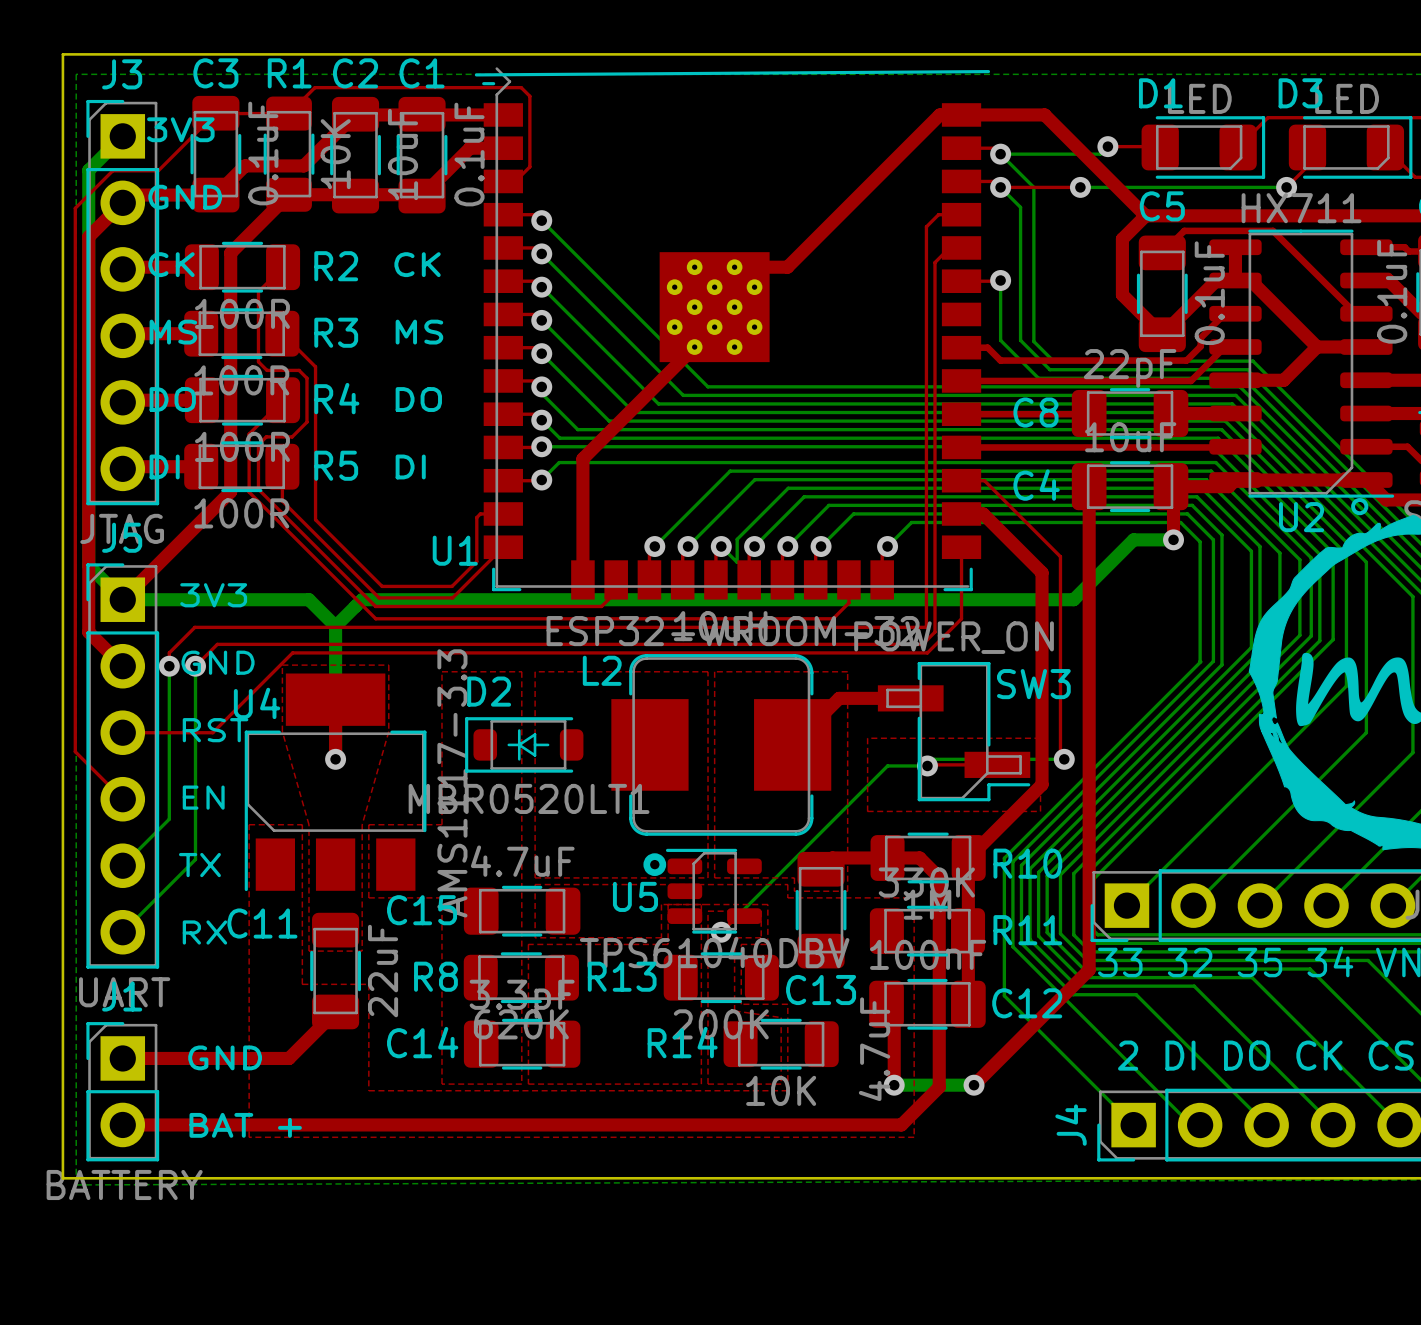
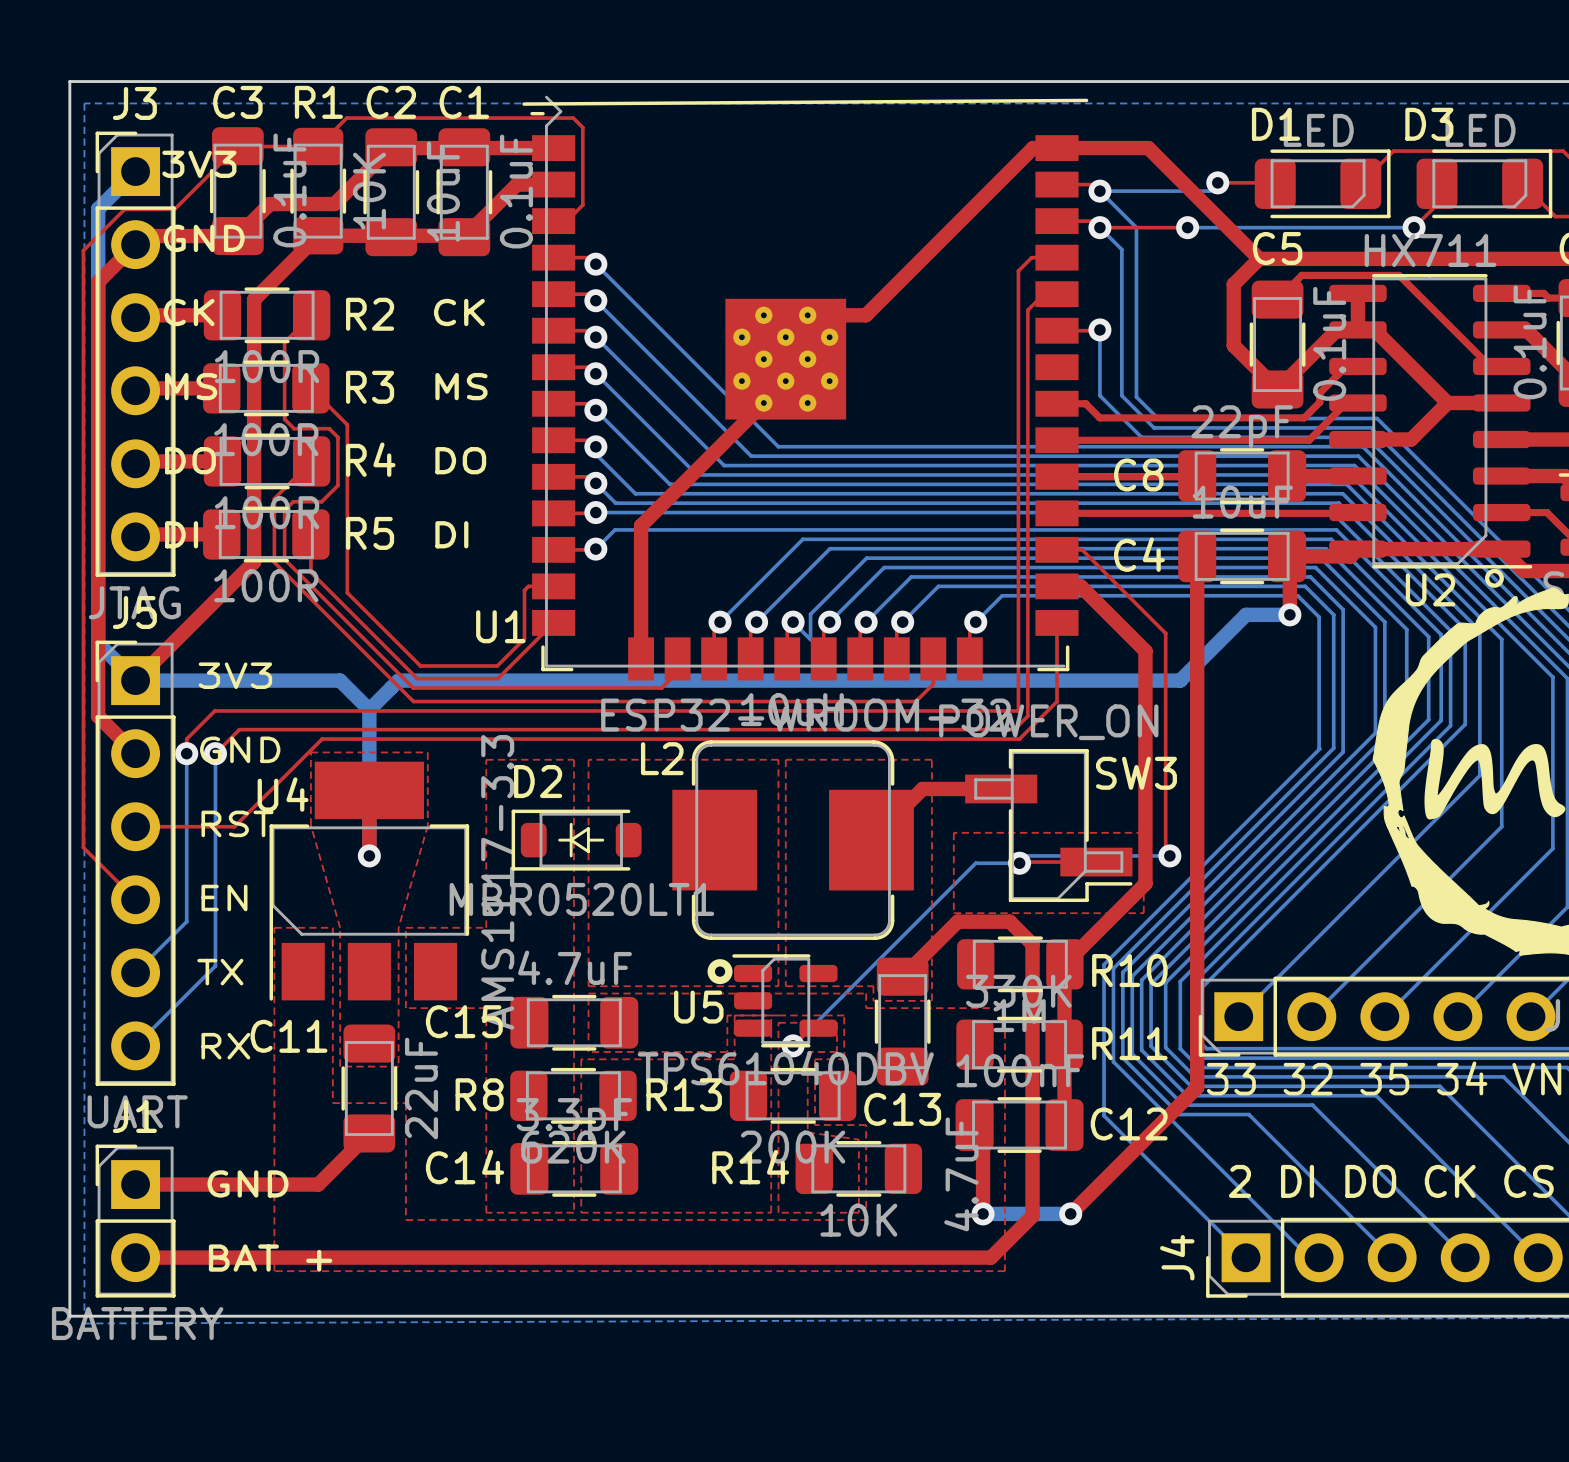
top track: (832, 857) (919, 857) (939, 877) -> (915, 964) (957, 921) (1009, 921) (1032, 944) (1032, 985)

